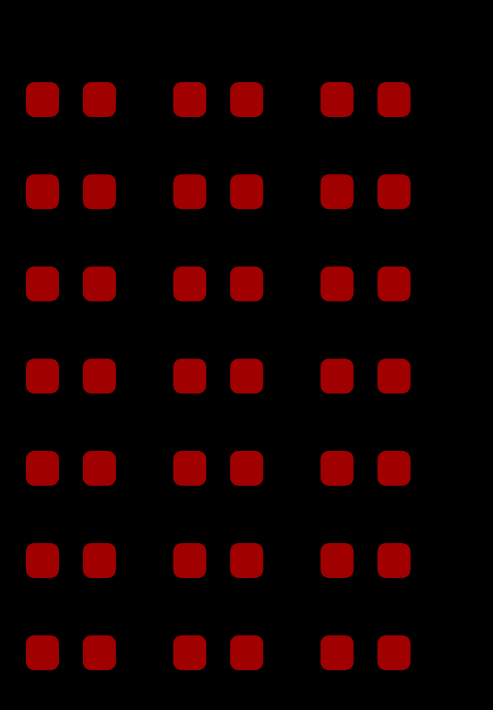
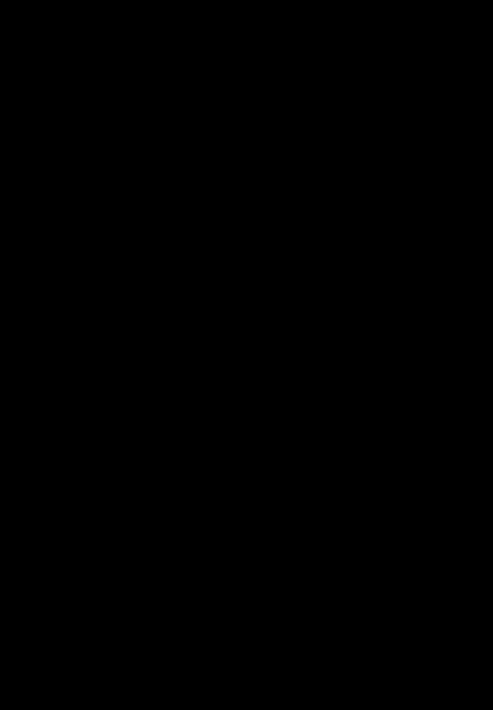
part: (70, 99) -> none
part: (218, 99) -> none
part: (365, 99) -> none
part: (70, 191) -> none
part: (218, 191) -> none
part: (365, 191) -> none
part: (70, 283) -> none
part: (218, 283) -> none
part: (365, 283) -> none
part: (70, 376) -> none
part: (218, 376) -> none
part: (365, 376) -> none
part: (70, 468) -> none
part: (218, 468) -> none
part: (365, 468) -> none
part: (70, 560) -> none
part: (218, 560) -> none
part: (365, 560) -> none
part: (70, 652) -> none
part: (218, 652) -> none
part: (365, 652) -> none

